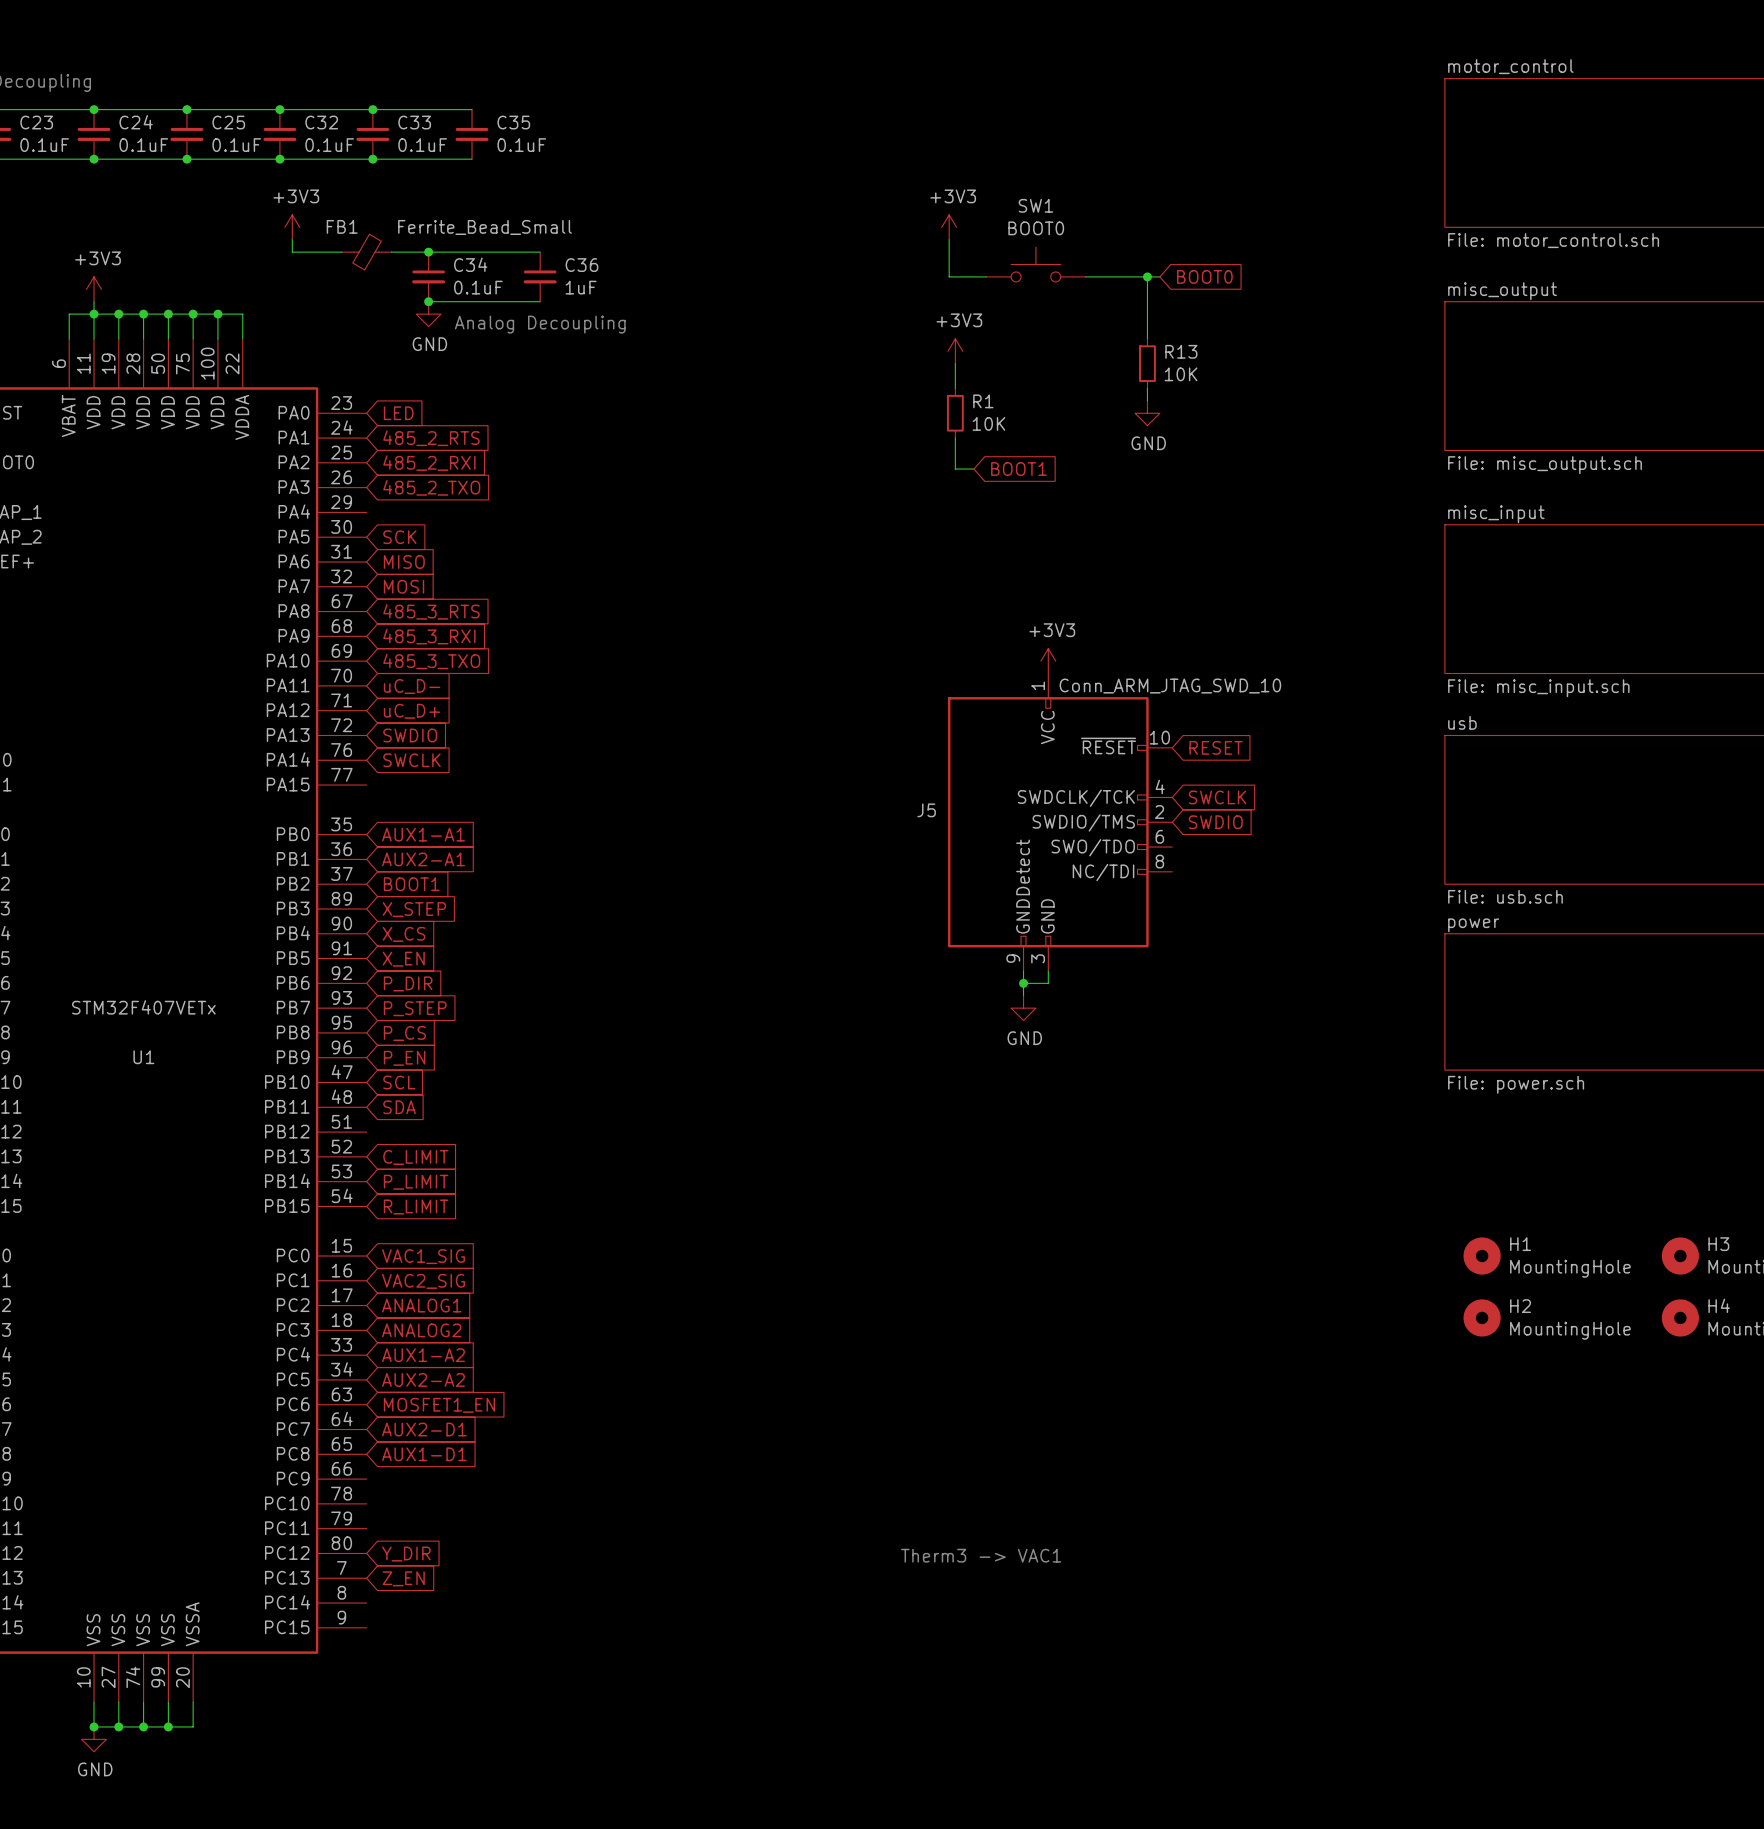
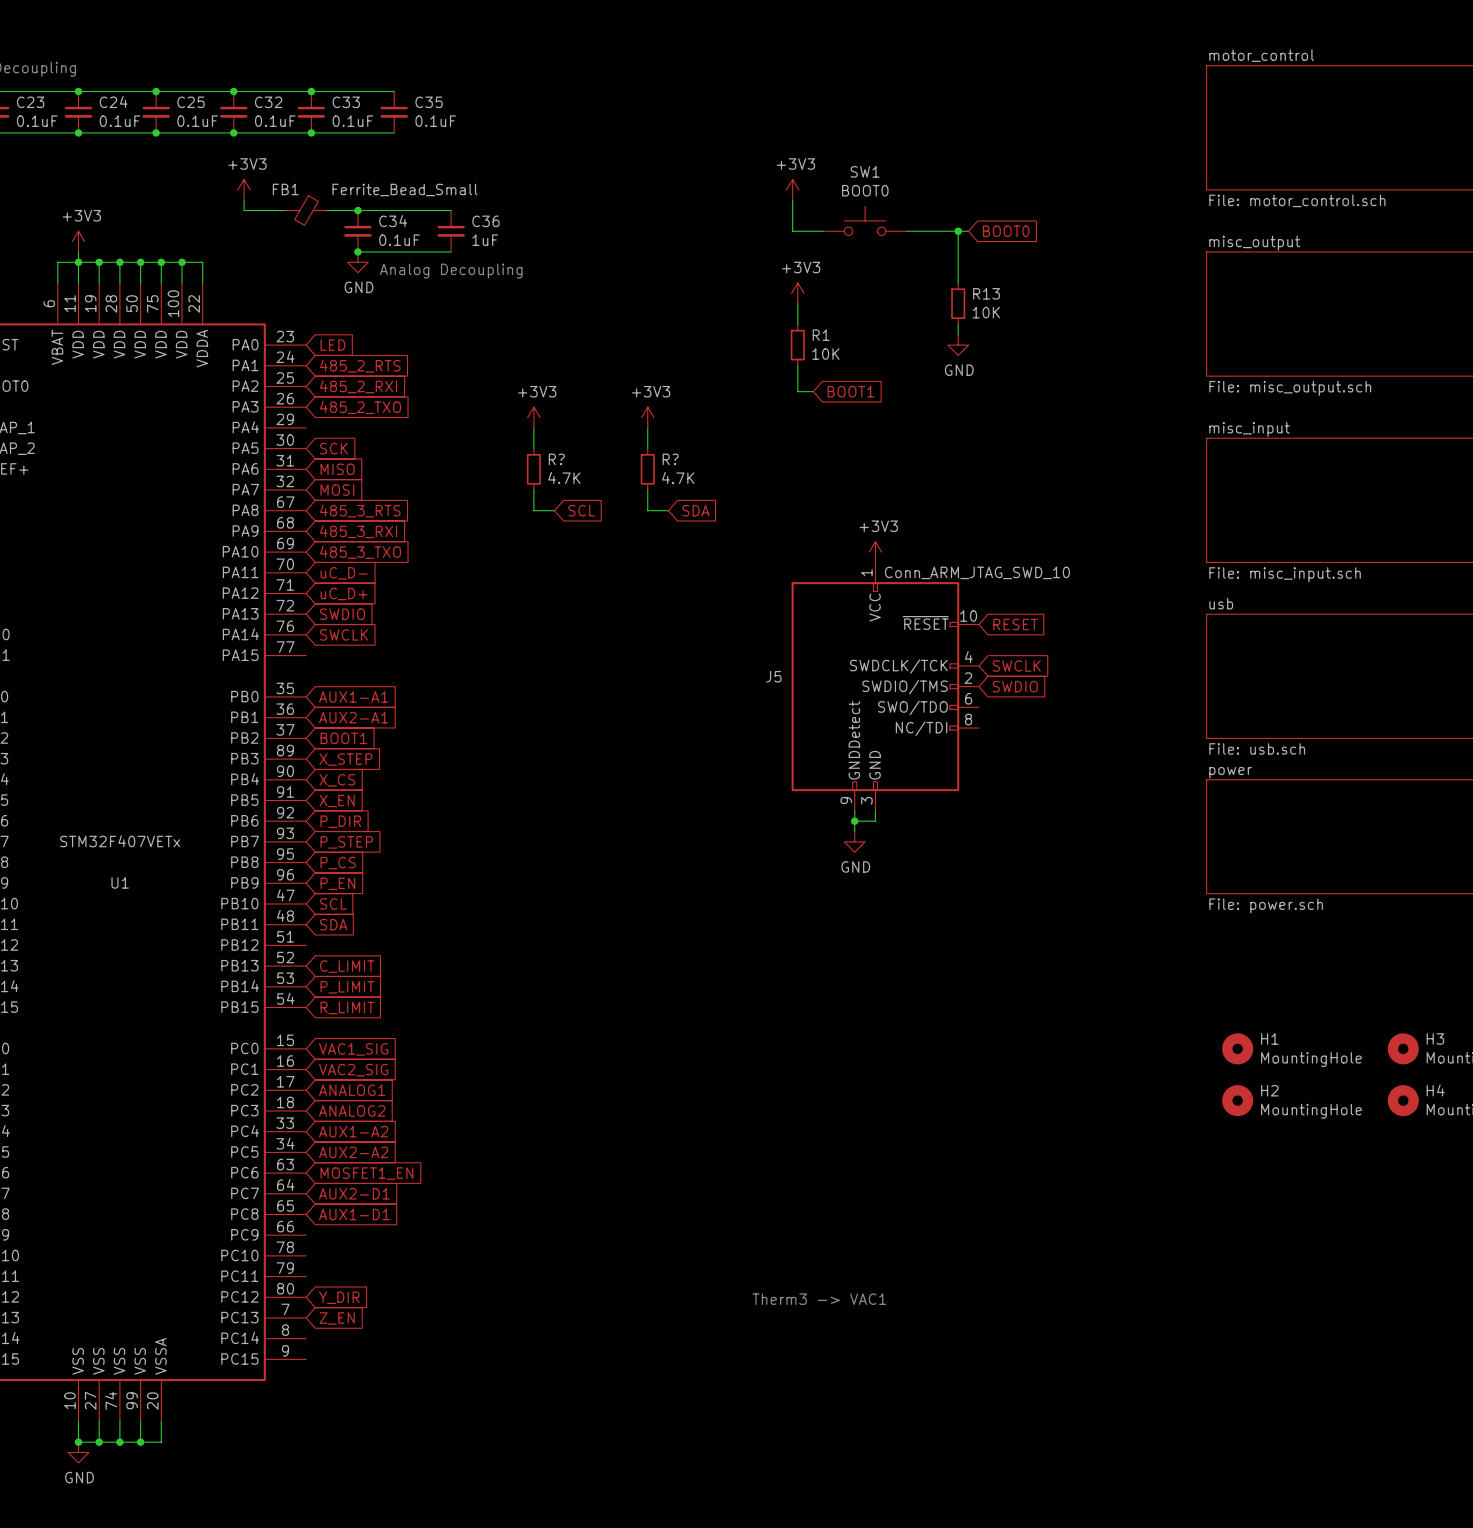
power symbol: none -> +3V3 (533, 417)
power symbol: none -> +3V3 (647, 417)
wire: none -> (533, 427) (533, 448)
wire: none -> (647, 427) (647, 448)
R?: none -> 4.7K (533, 469)
R?: none -> 4.7K (647, 469)
wire: none -> (533, 490) (533, 510) (554, 510)
wire: none -> (647, 490) (647, 510) (668, 510)
global label: none -> SCL (581, 510)
global label: none -> SDA (695, 510)

